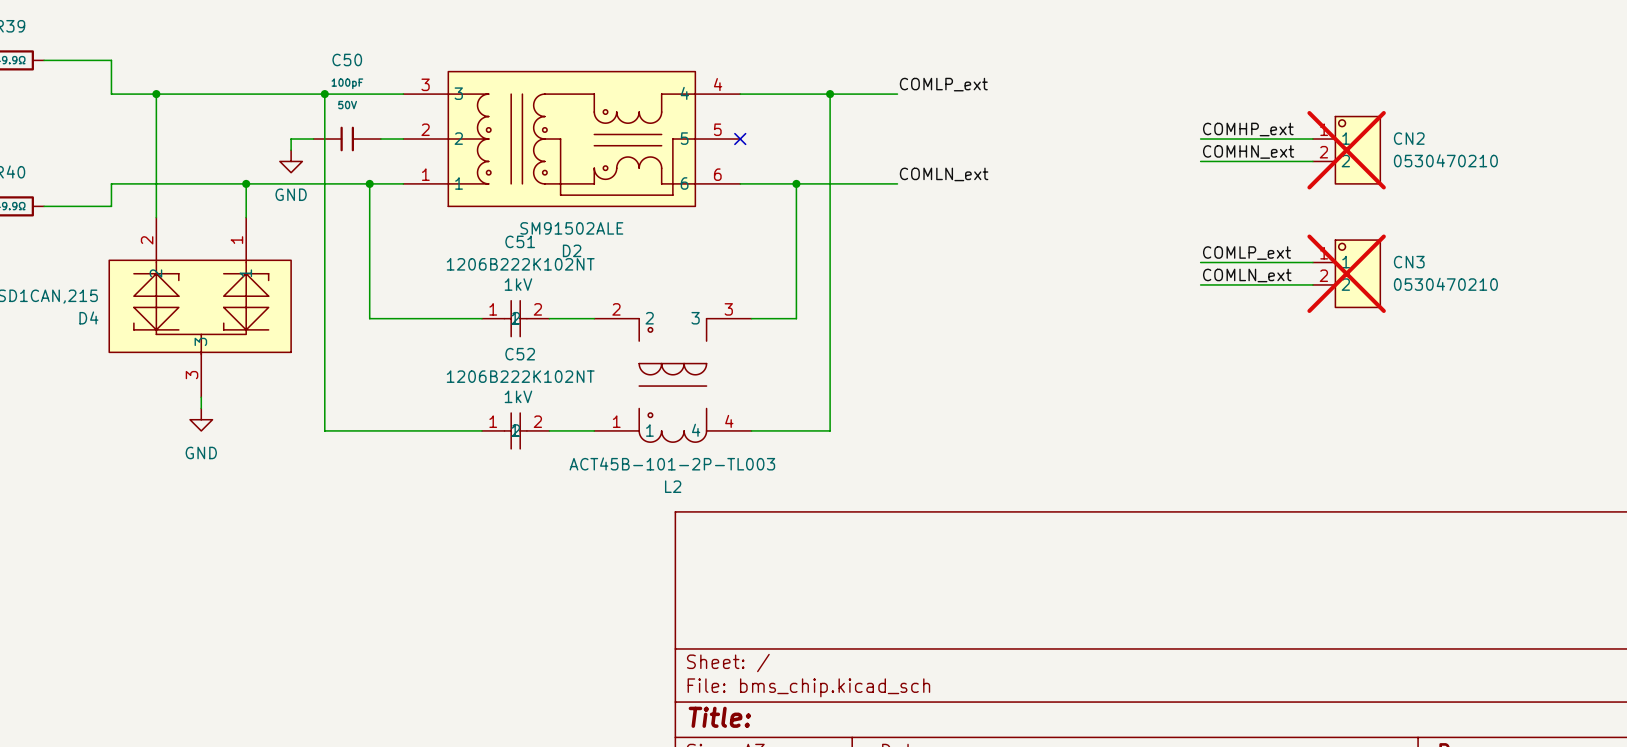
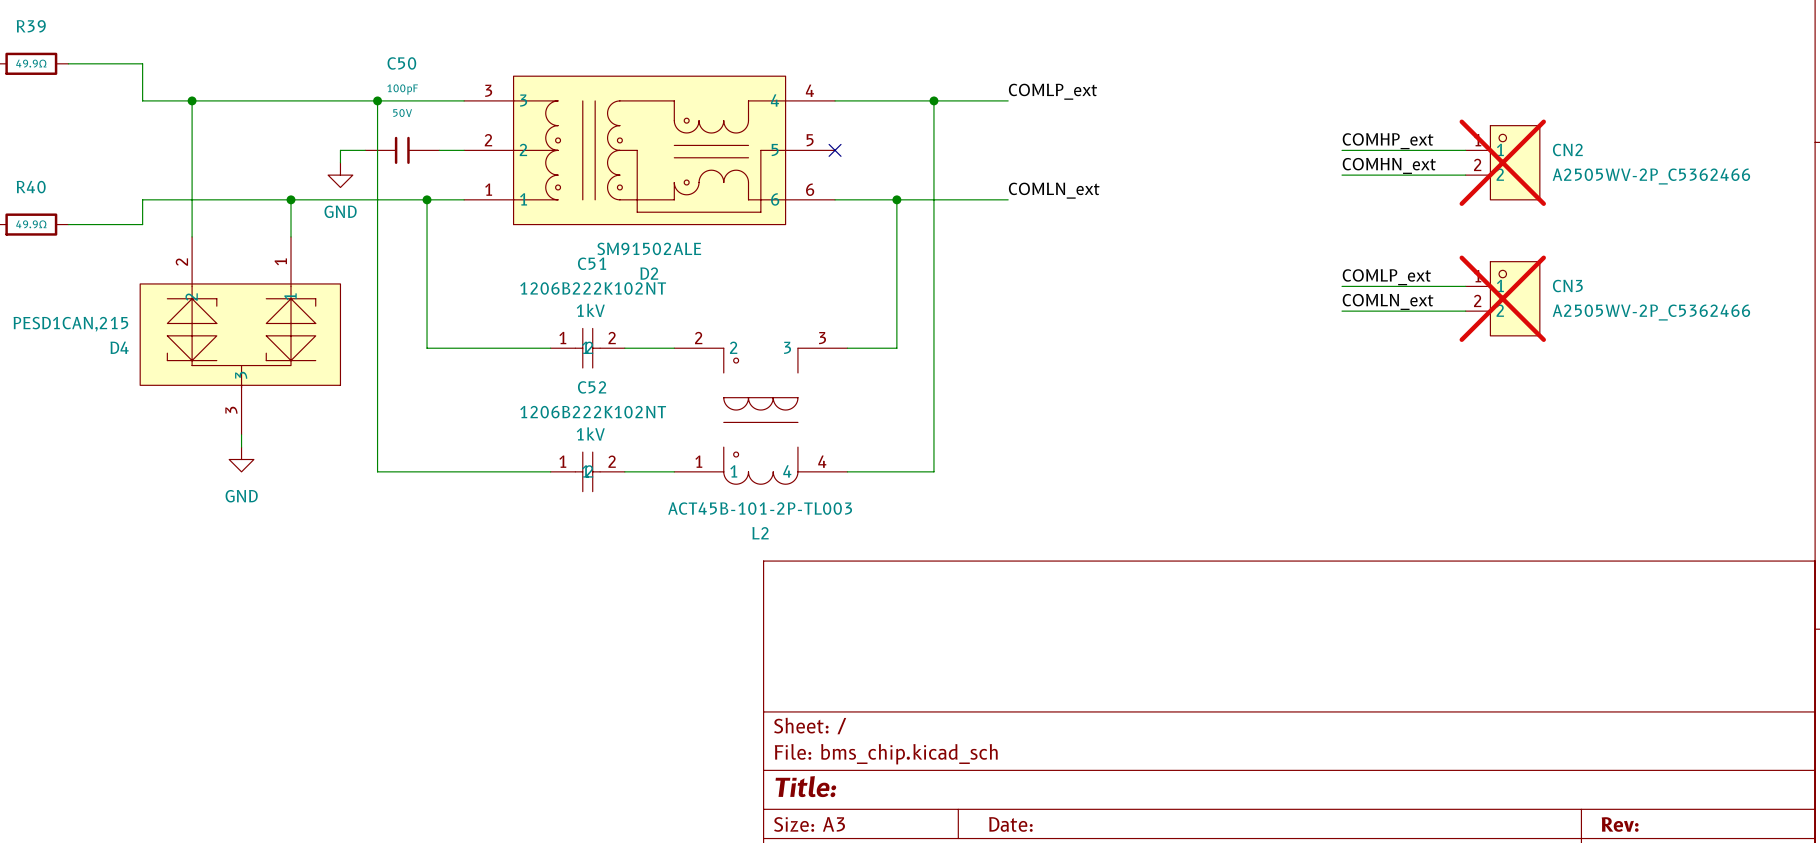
CN2 symbol: [1312, 116, 1381, 184] -> [1465, 125, 1540, 200]
CN2 value: 0530470210 (1445, 160) -> A2505WV-2P_C5362466 (1651, 176)
CN3 symbol: [1312, 240, 1381, 308] -> [1465, 261, 1540, 336]
CN3 value: 0530470210 (1445, 284) -> A2505WV-2P_C5362466 (1651, 312)

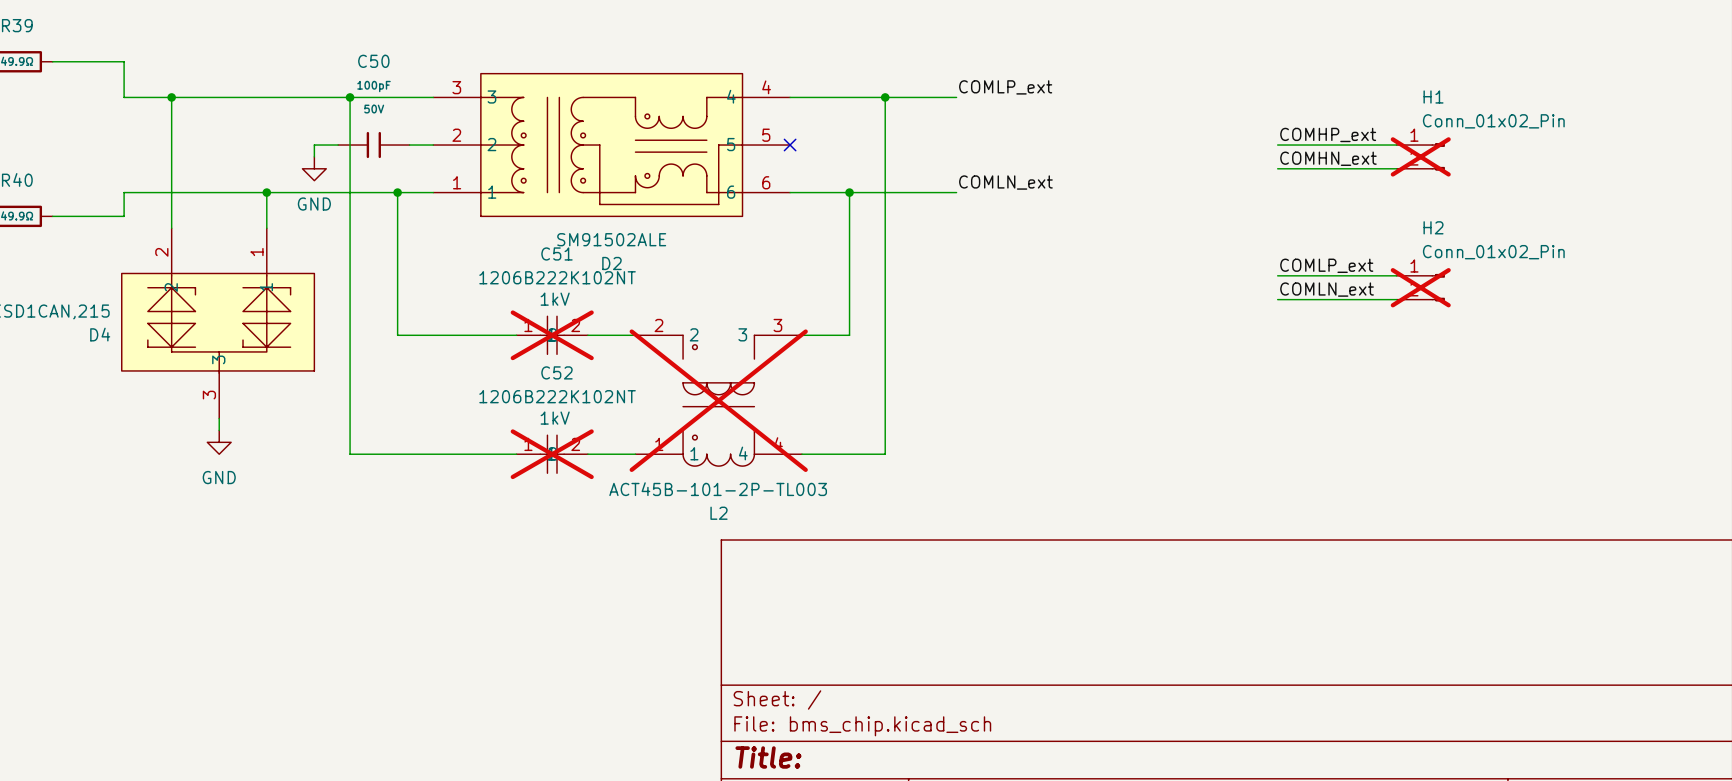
H1: none -> Conn_01x02_Pin (1420, 156)
CN2: A2505WV-2P_C5362466 (1502, 162) -> none
H2: none -> Conn_01x02_Pin (1420, 287)
CN3: A2505WV-2P_C5362466 (1502, 298) -> none
C51 do-not-place cross: none -> (552, 335)
L2 do-not-place cross: none -> (718, 400)
C52 do-not-place cross: none -> (552, 454)

